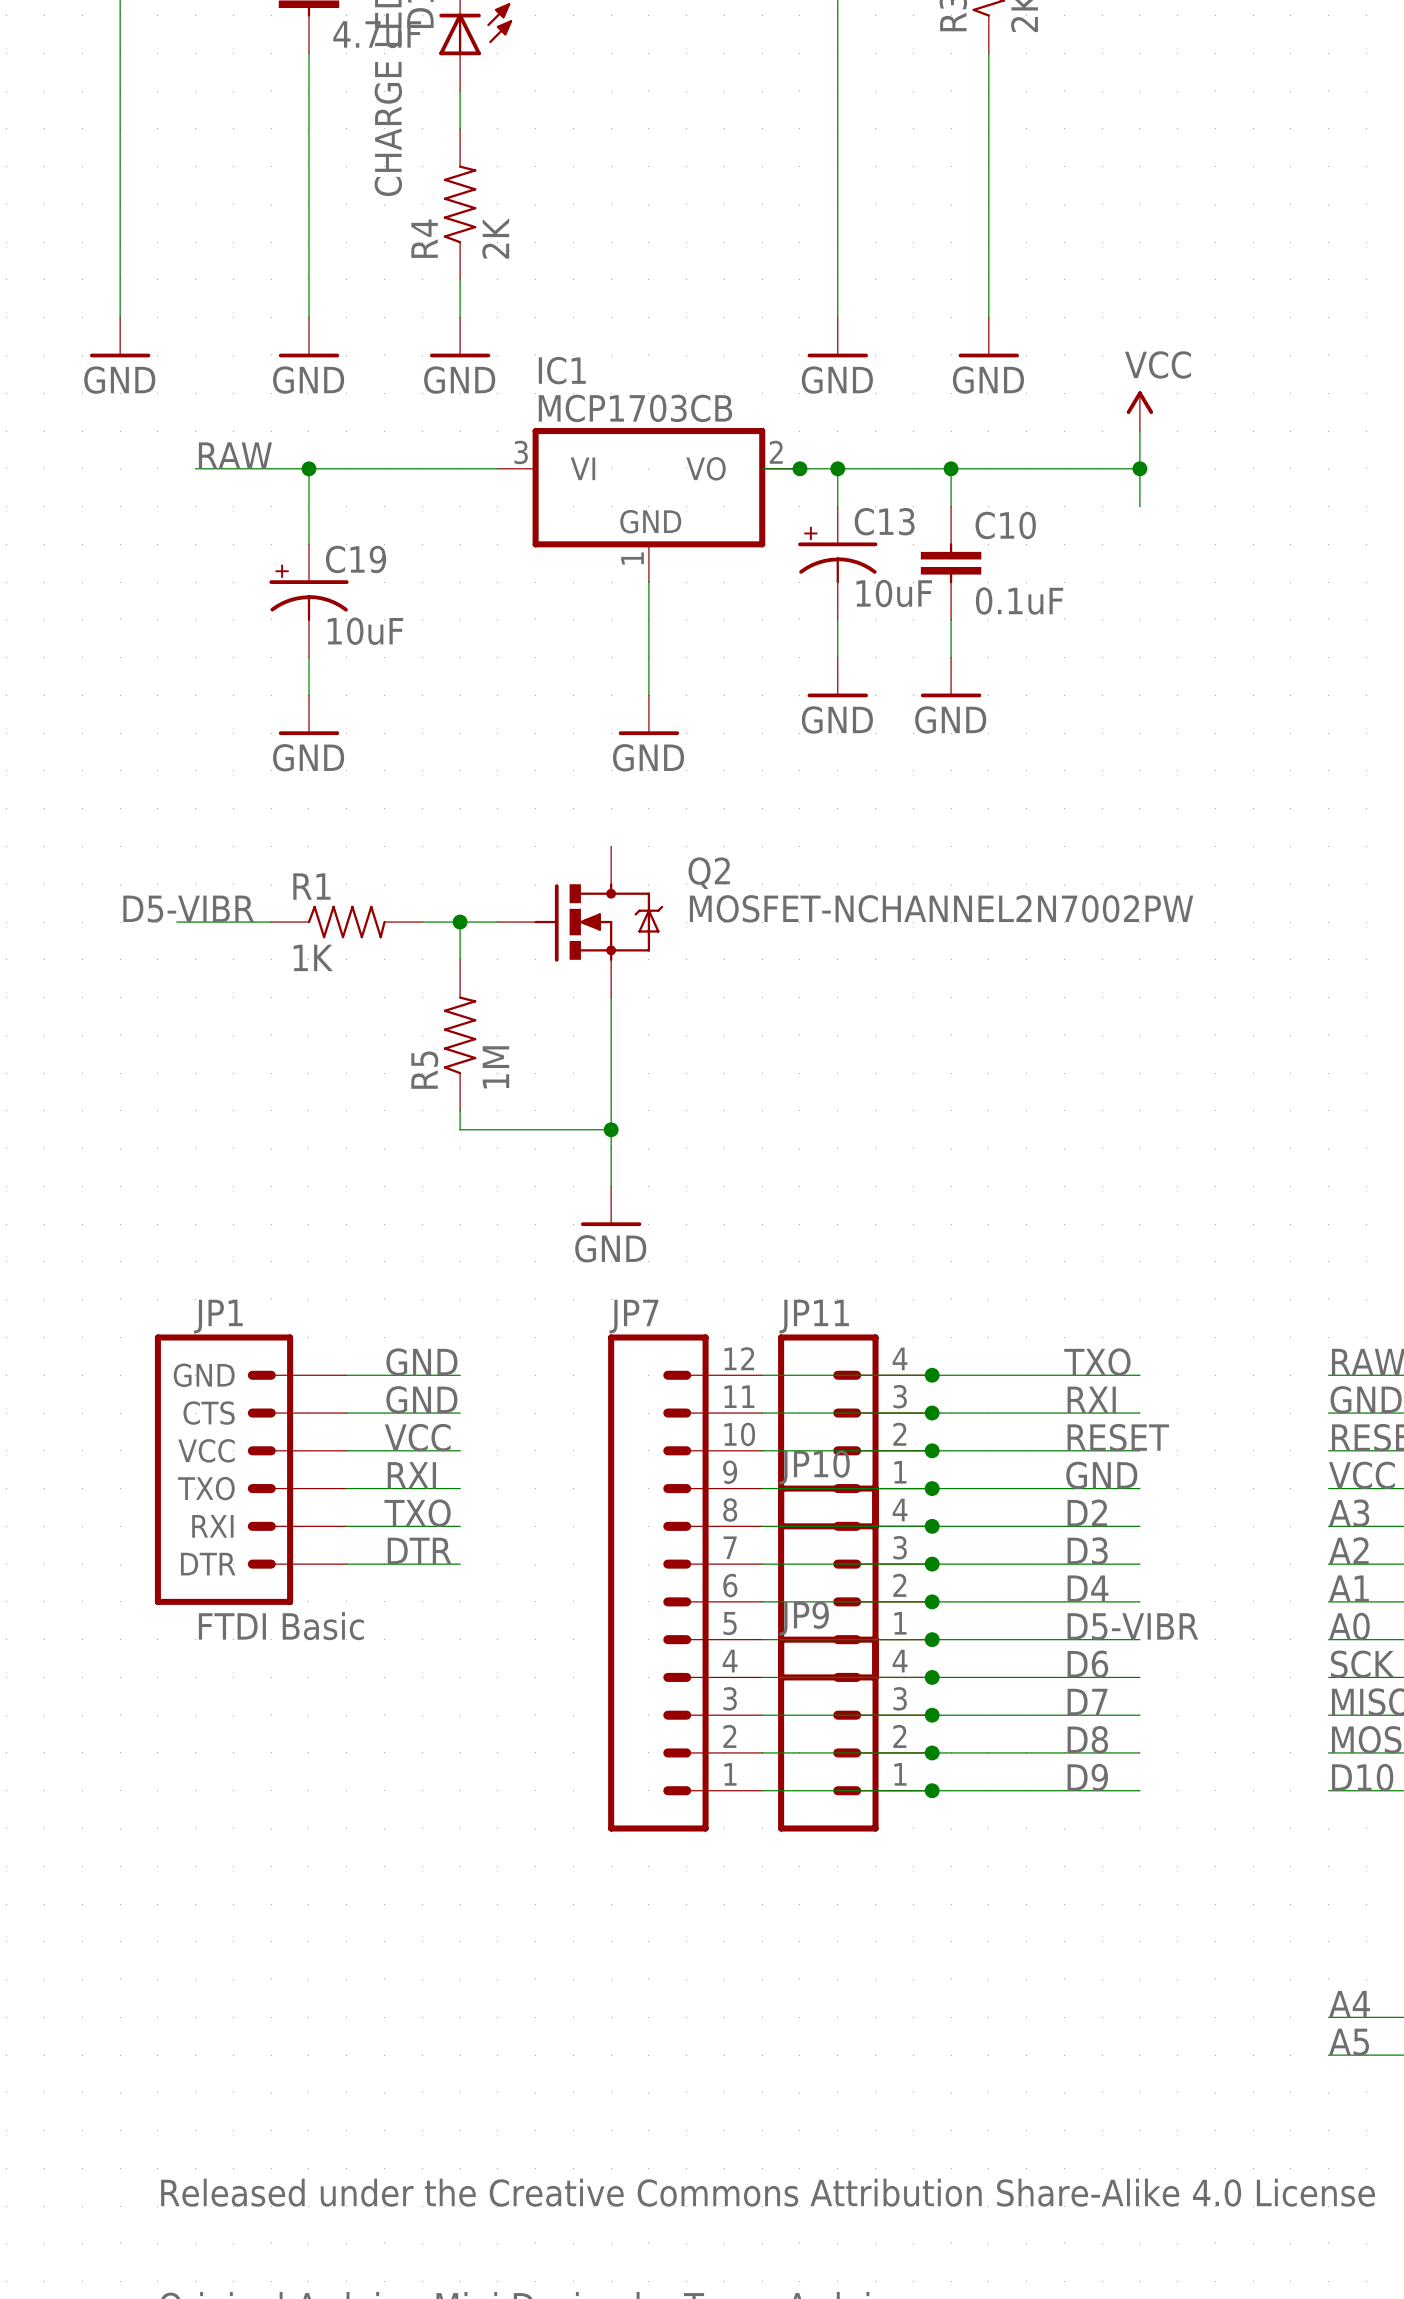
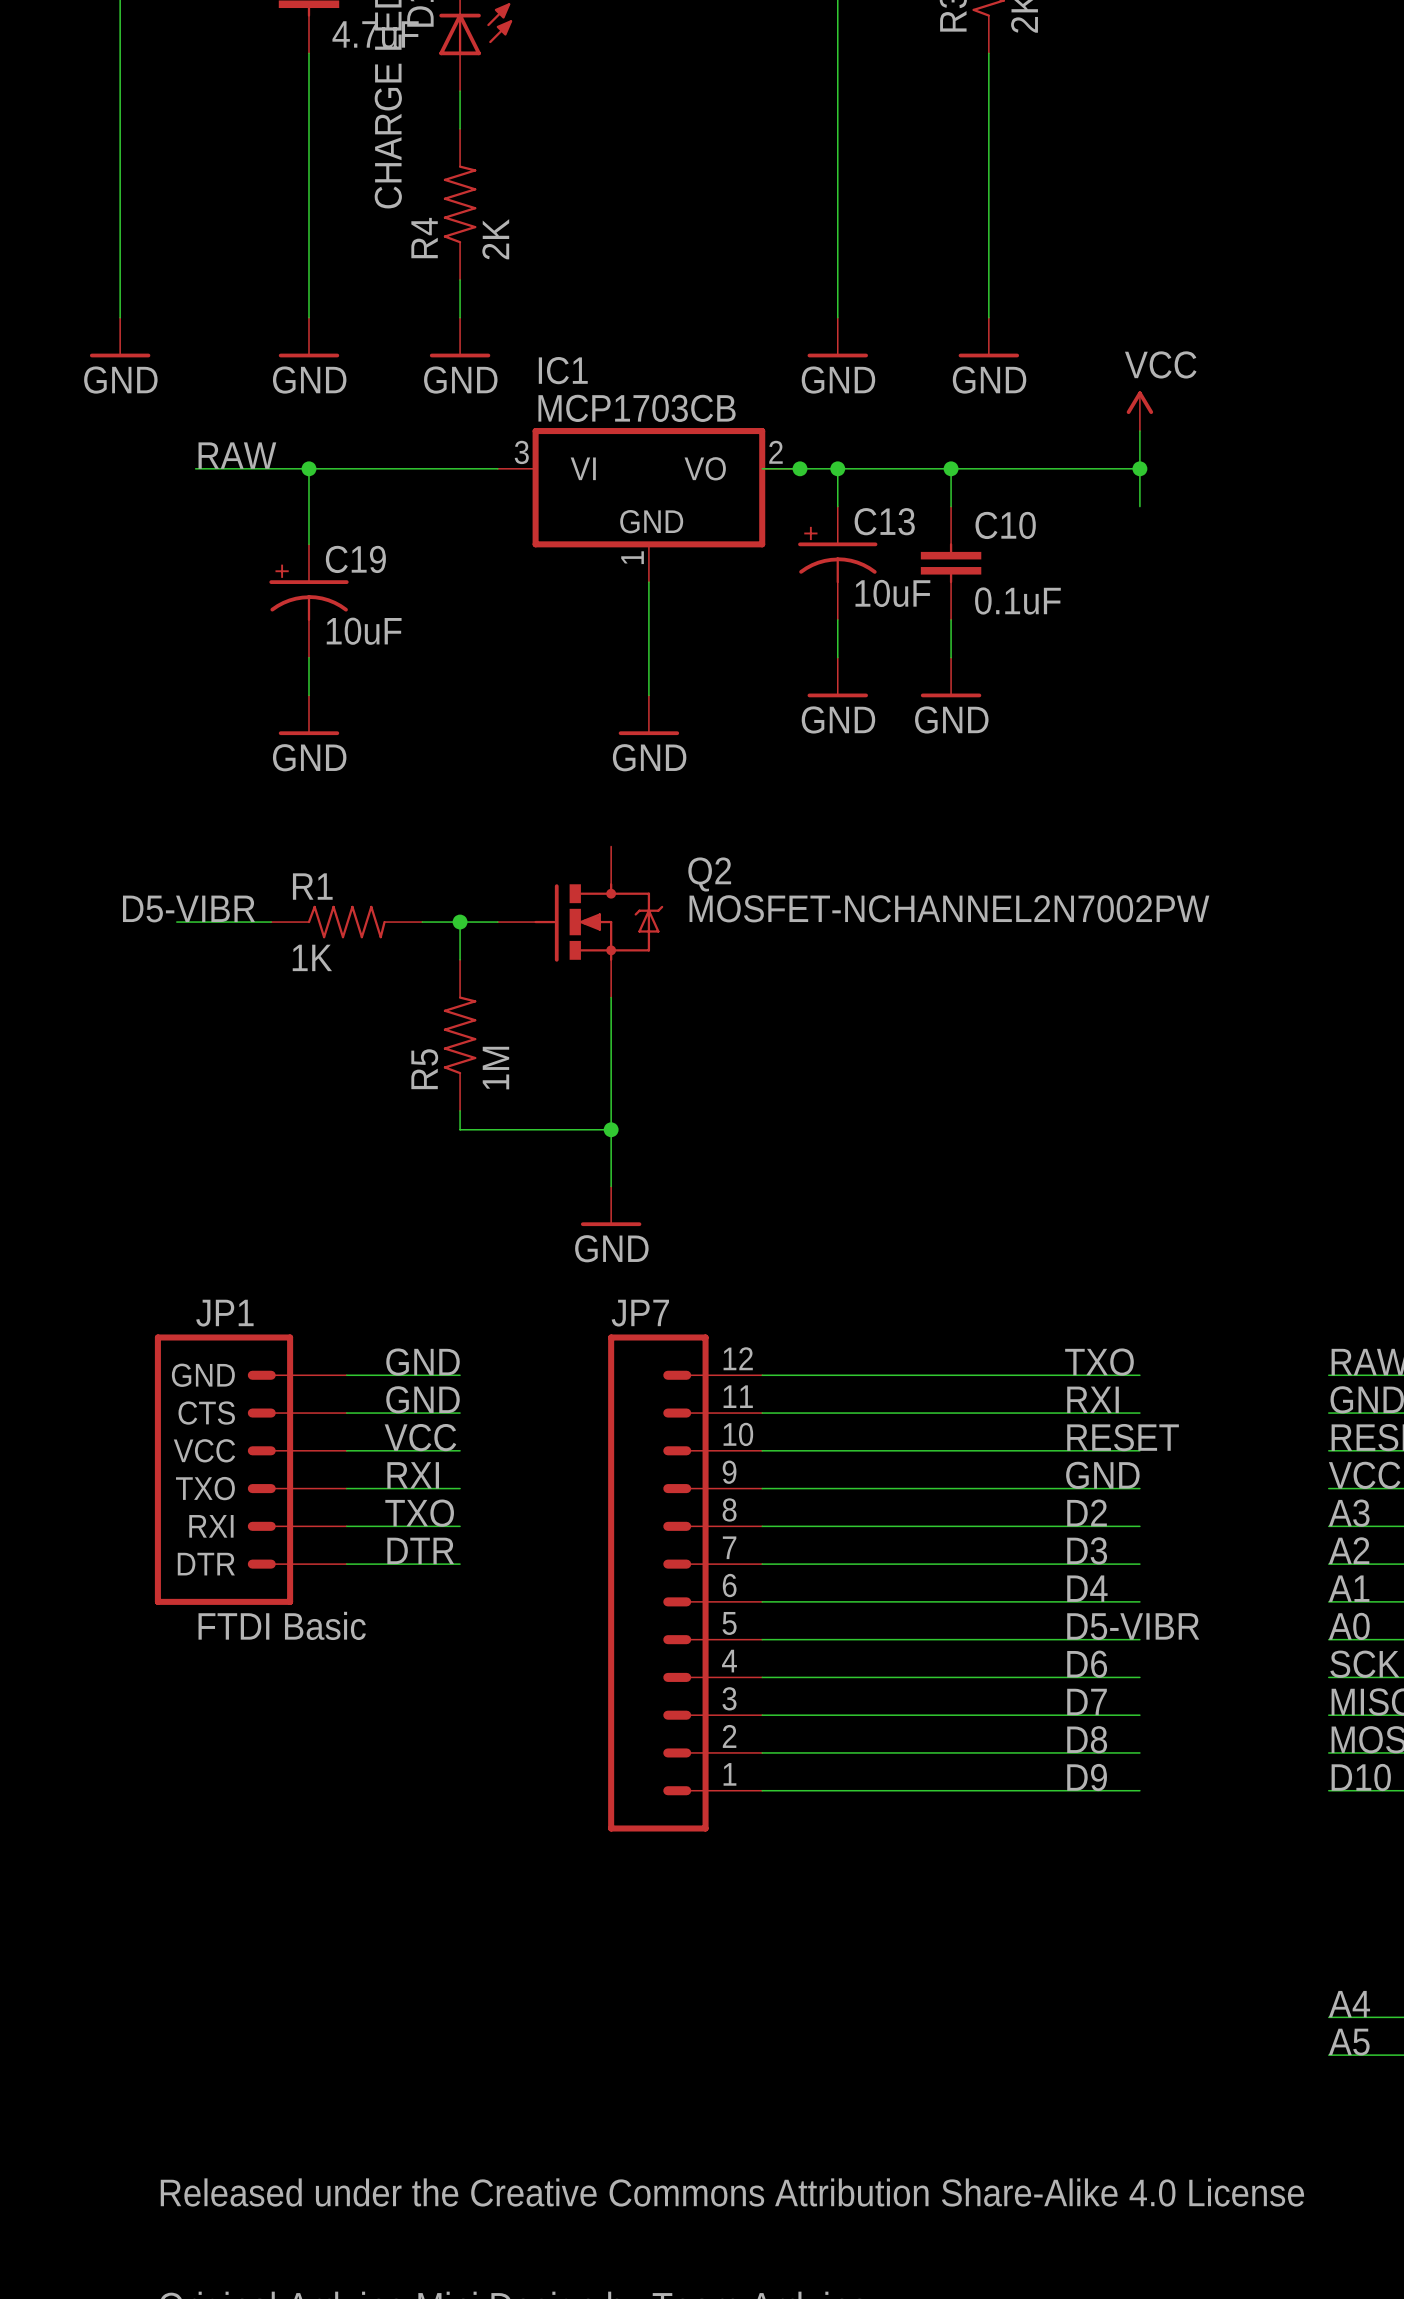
junction: (932, 1375) -> none
junction: (932, 1413) -> none
JP11: (855, 1431) -> none
junction: (932, 1450) -> none
junction: (932, 1488) -> none
junction: (932, 1526) -> none
junction: (932, 1564) -> none
JP10: (855, 1583) -> none
junction: (932, 1601) -> none
junction: (932, 1639) -> none
junction: (932, 1677) -> none
junction: (932, 1715) -> none
JP9: (855, 1734) -> none
junction: (932, 1752) -> none
junction: (932, 1790) -> none

